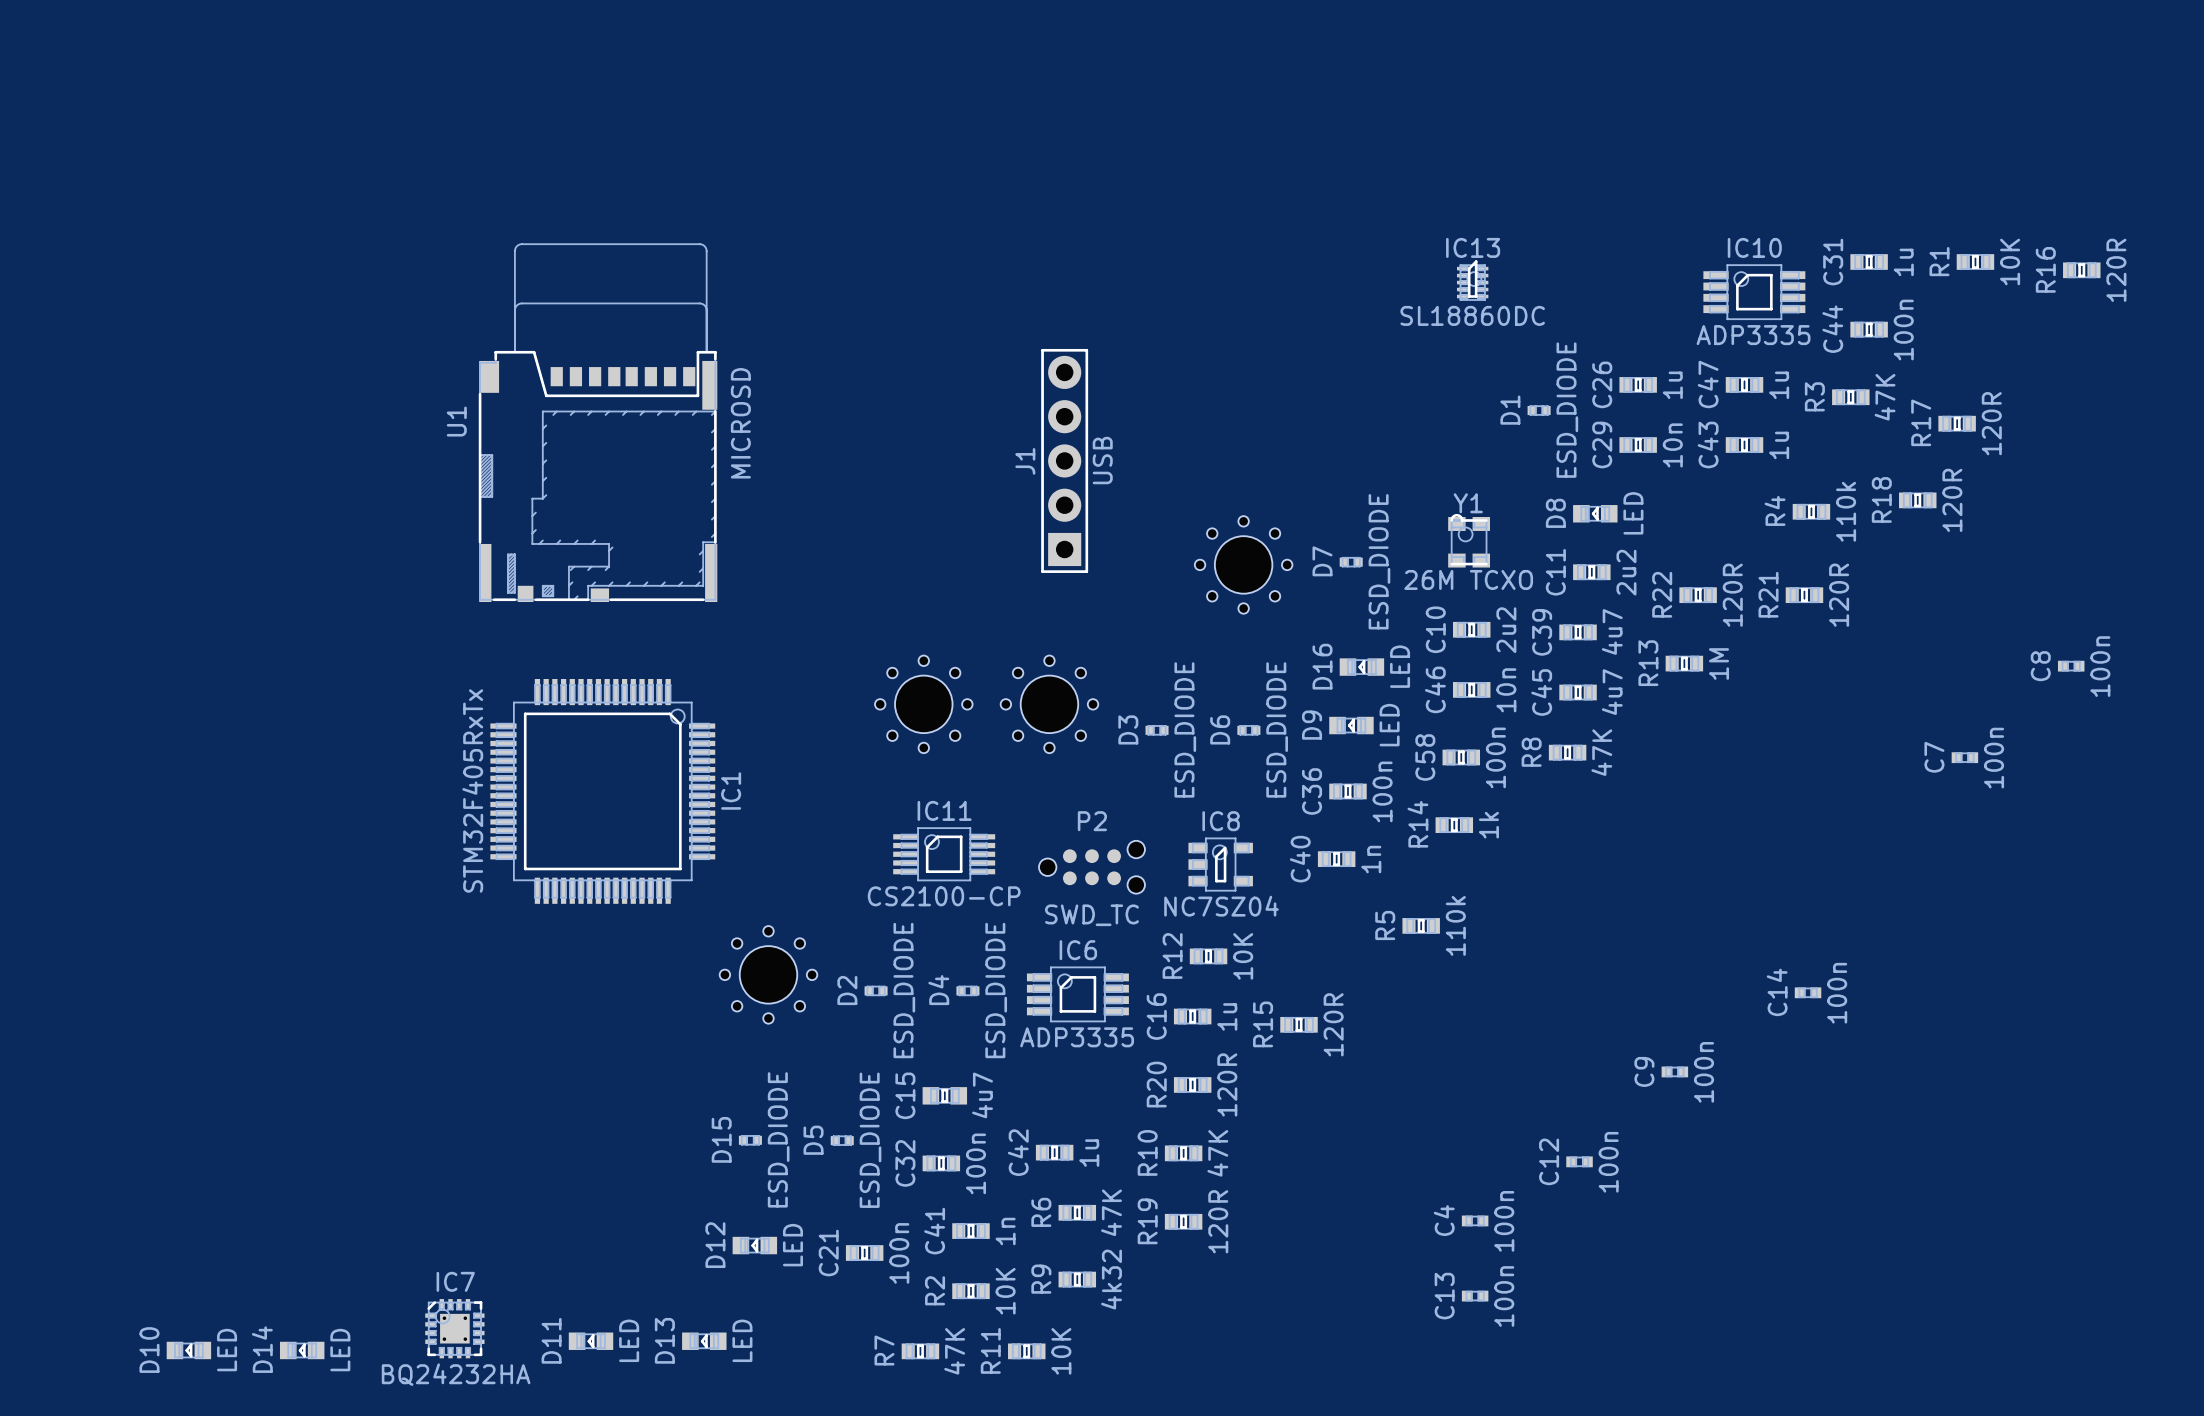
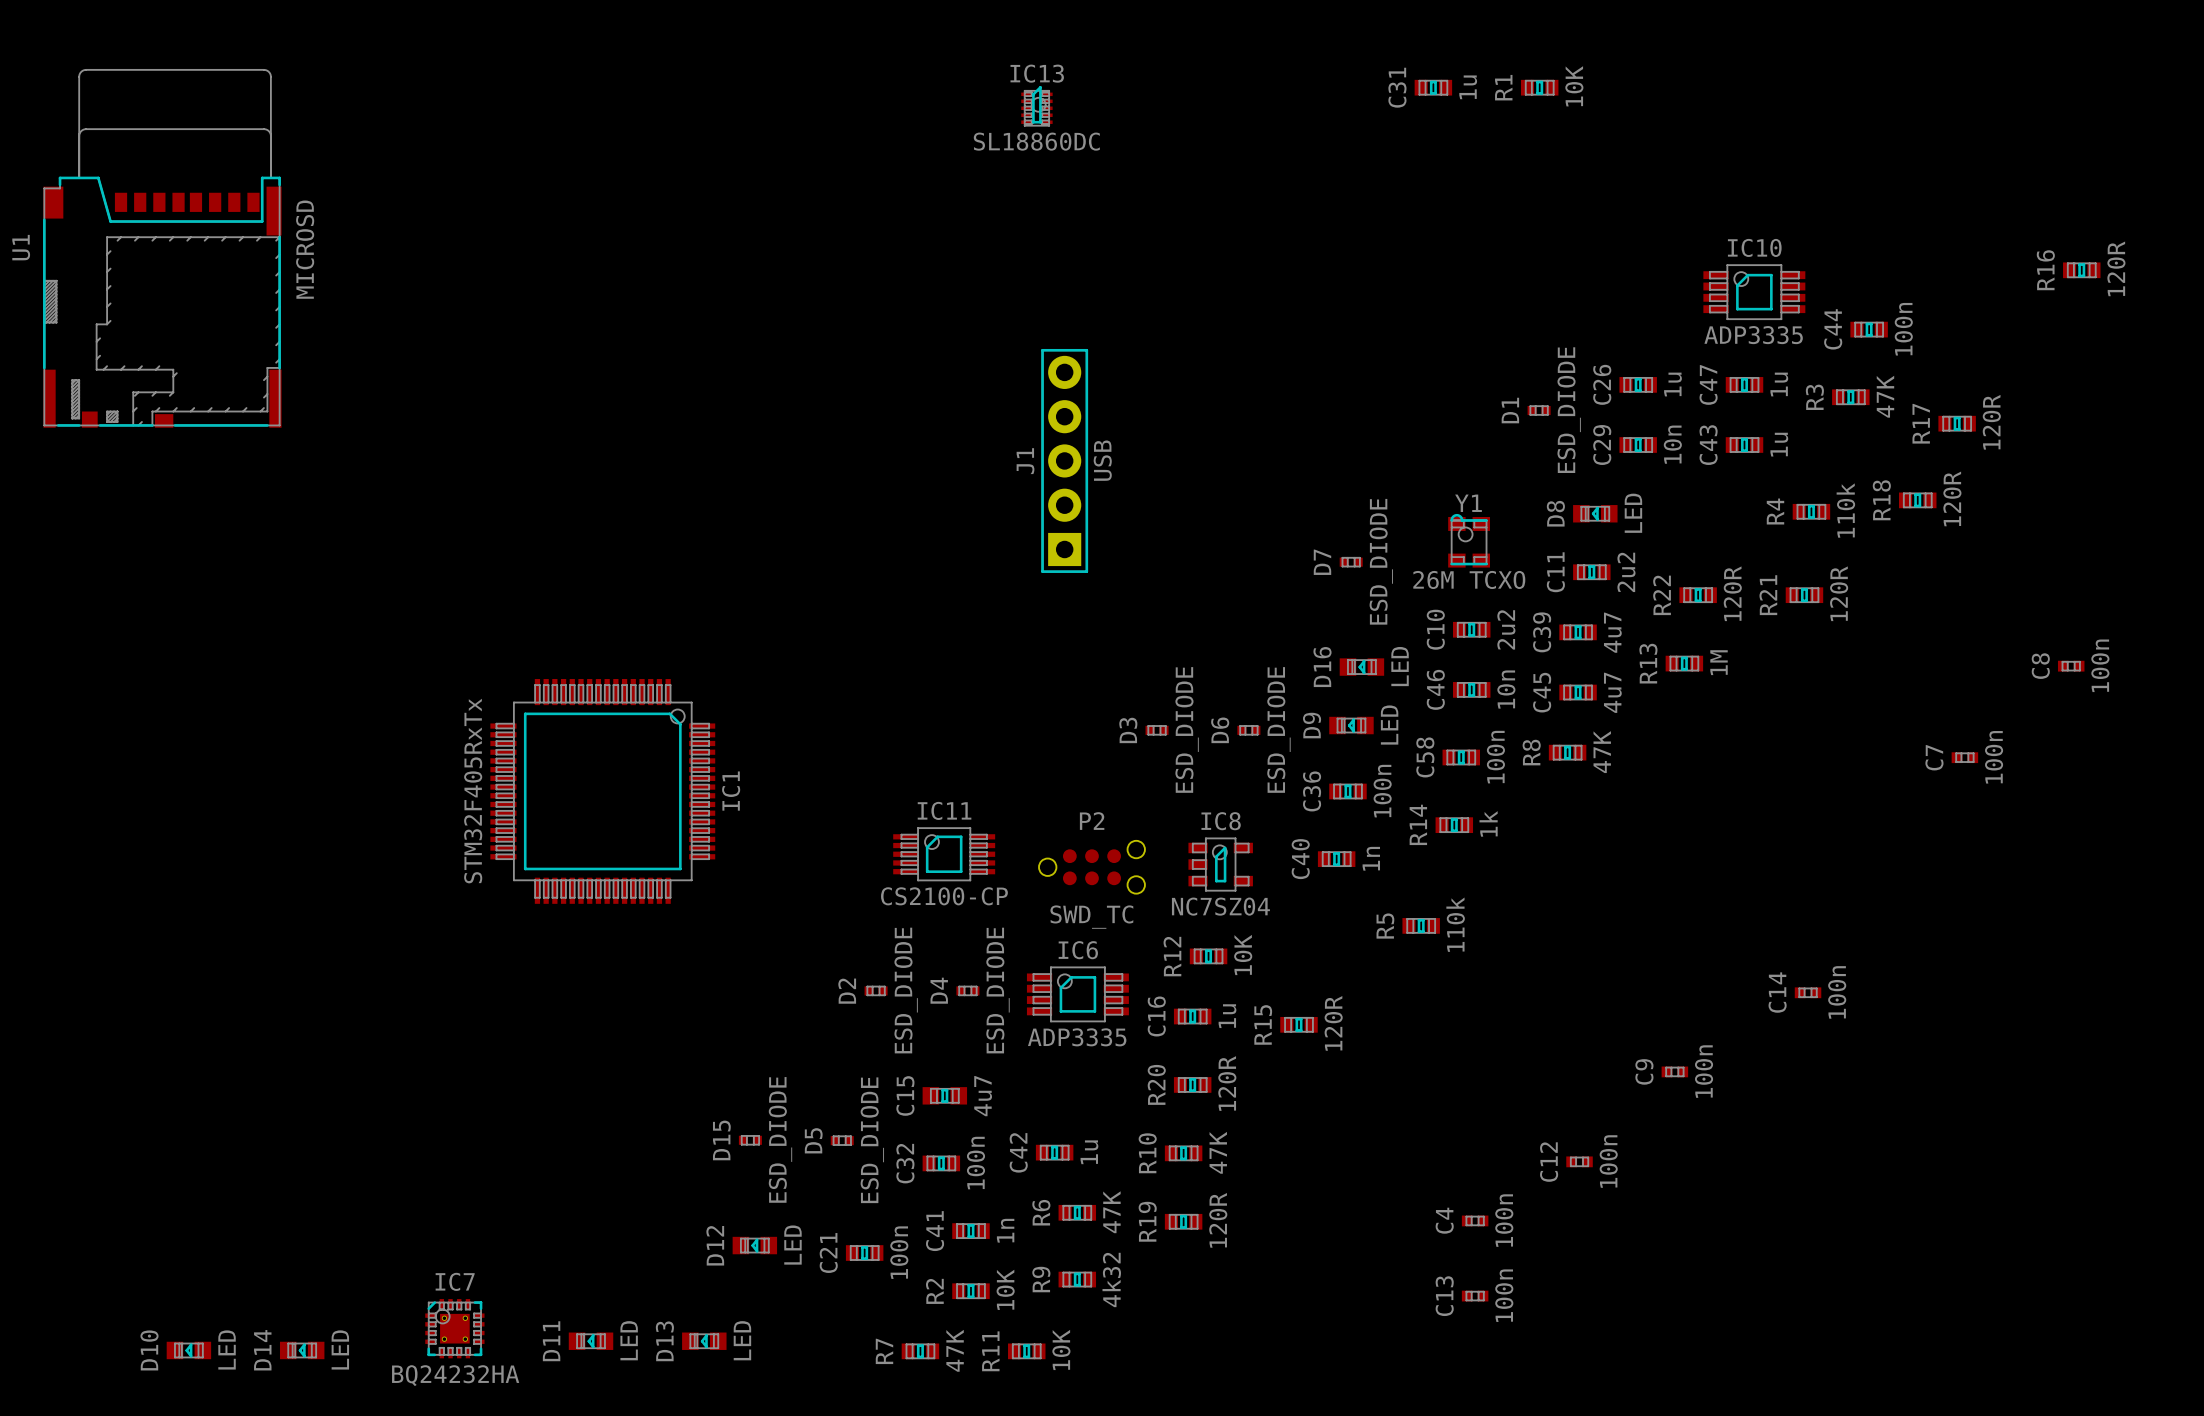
C31 position: (1869, 262) -> (1433, 87)
R1 position: (1975, 262) -> (1539, 87)
IC13 position: (1472, 280) -> (1036, 105)
U1 position: (598, 423) -> (162, 248)
part: (1243, 564) -> none
part: (923, 704) -> none
part: (1049, 704) -> none
part: (768, 974) -> none

